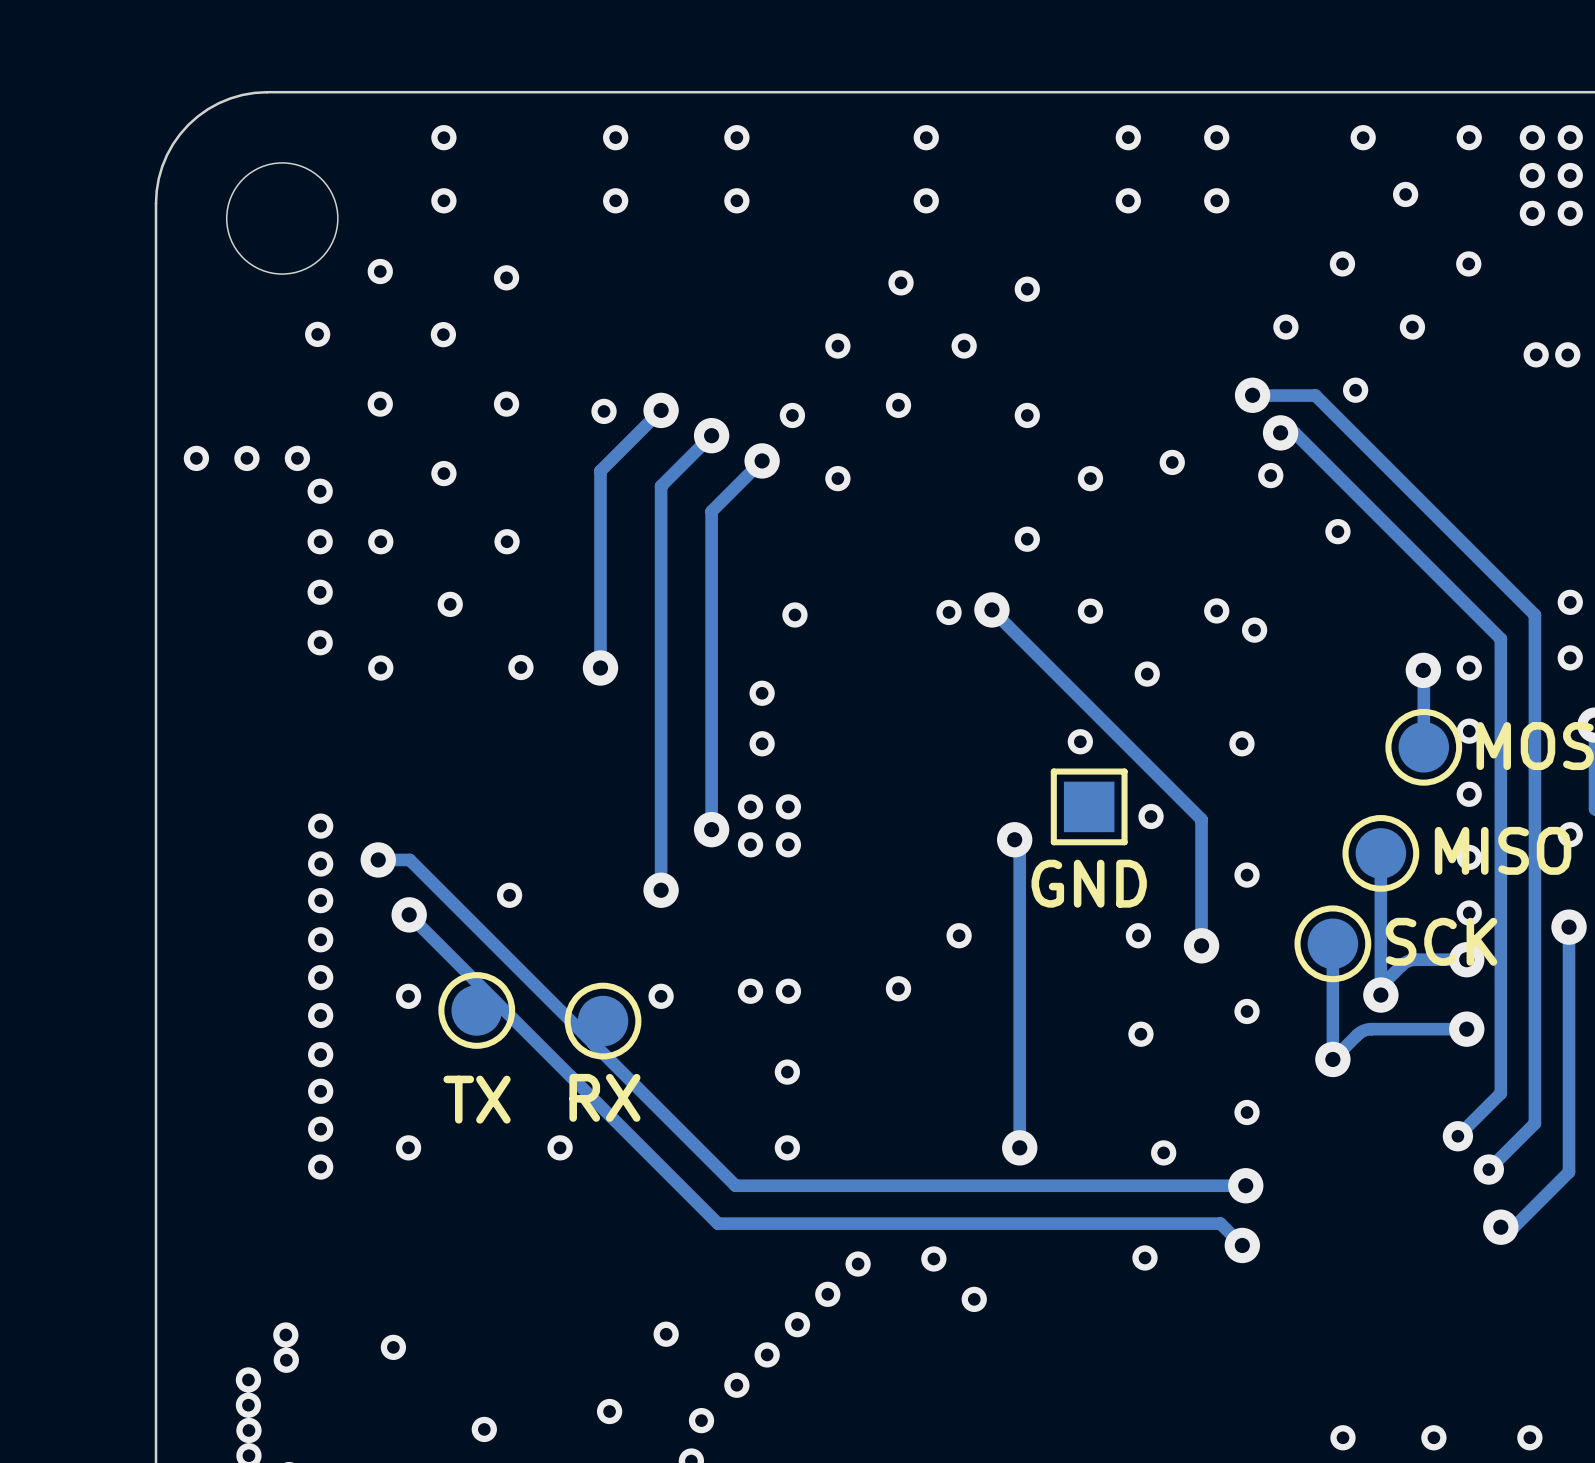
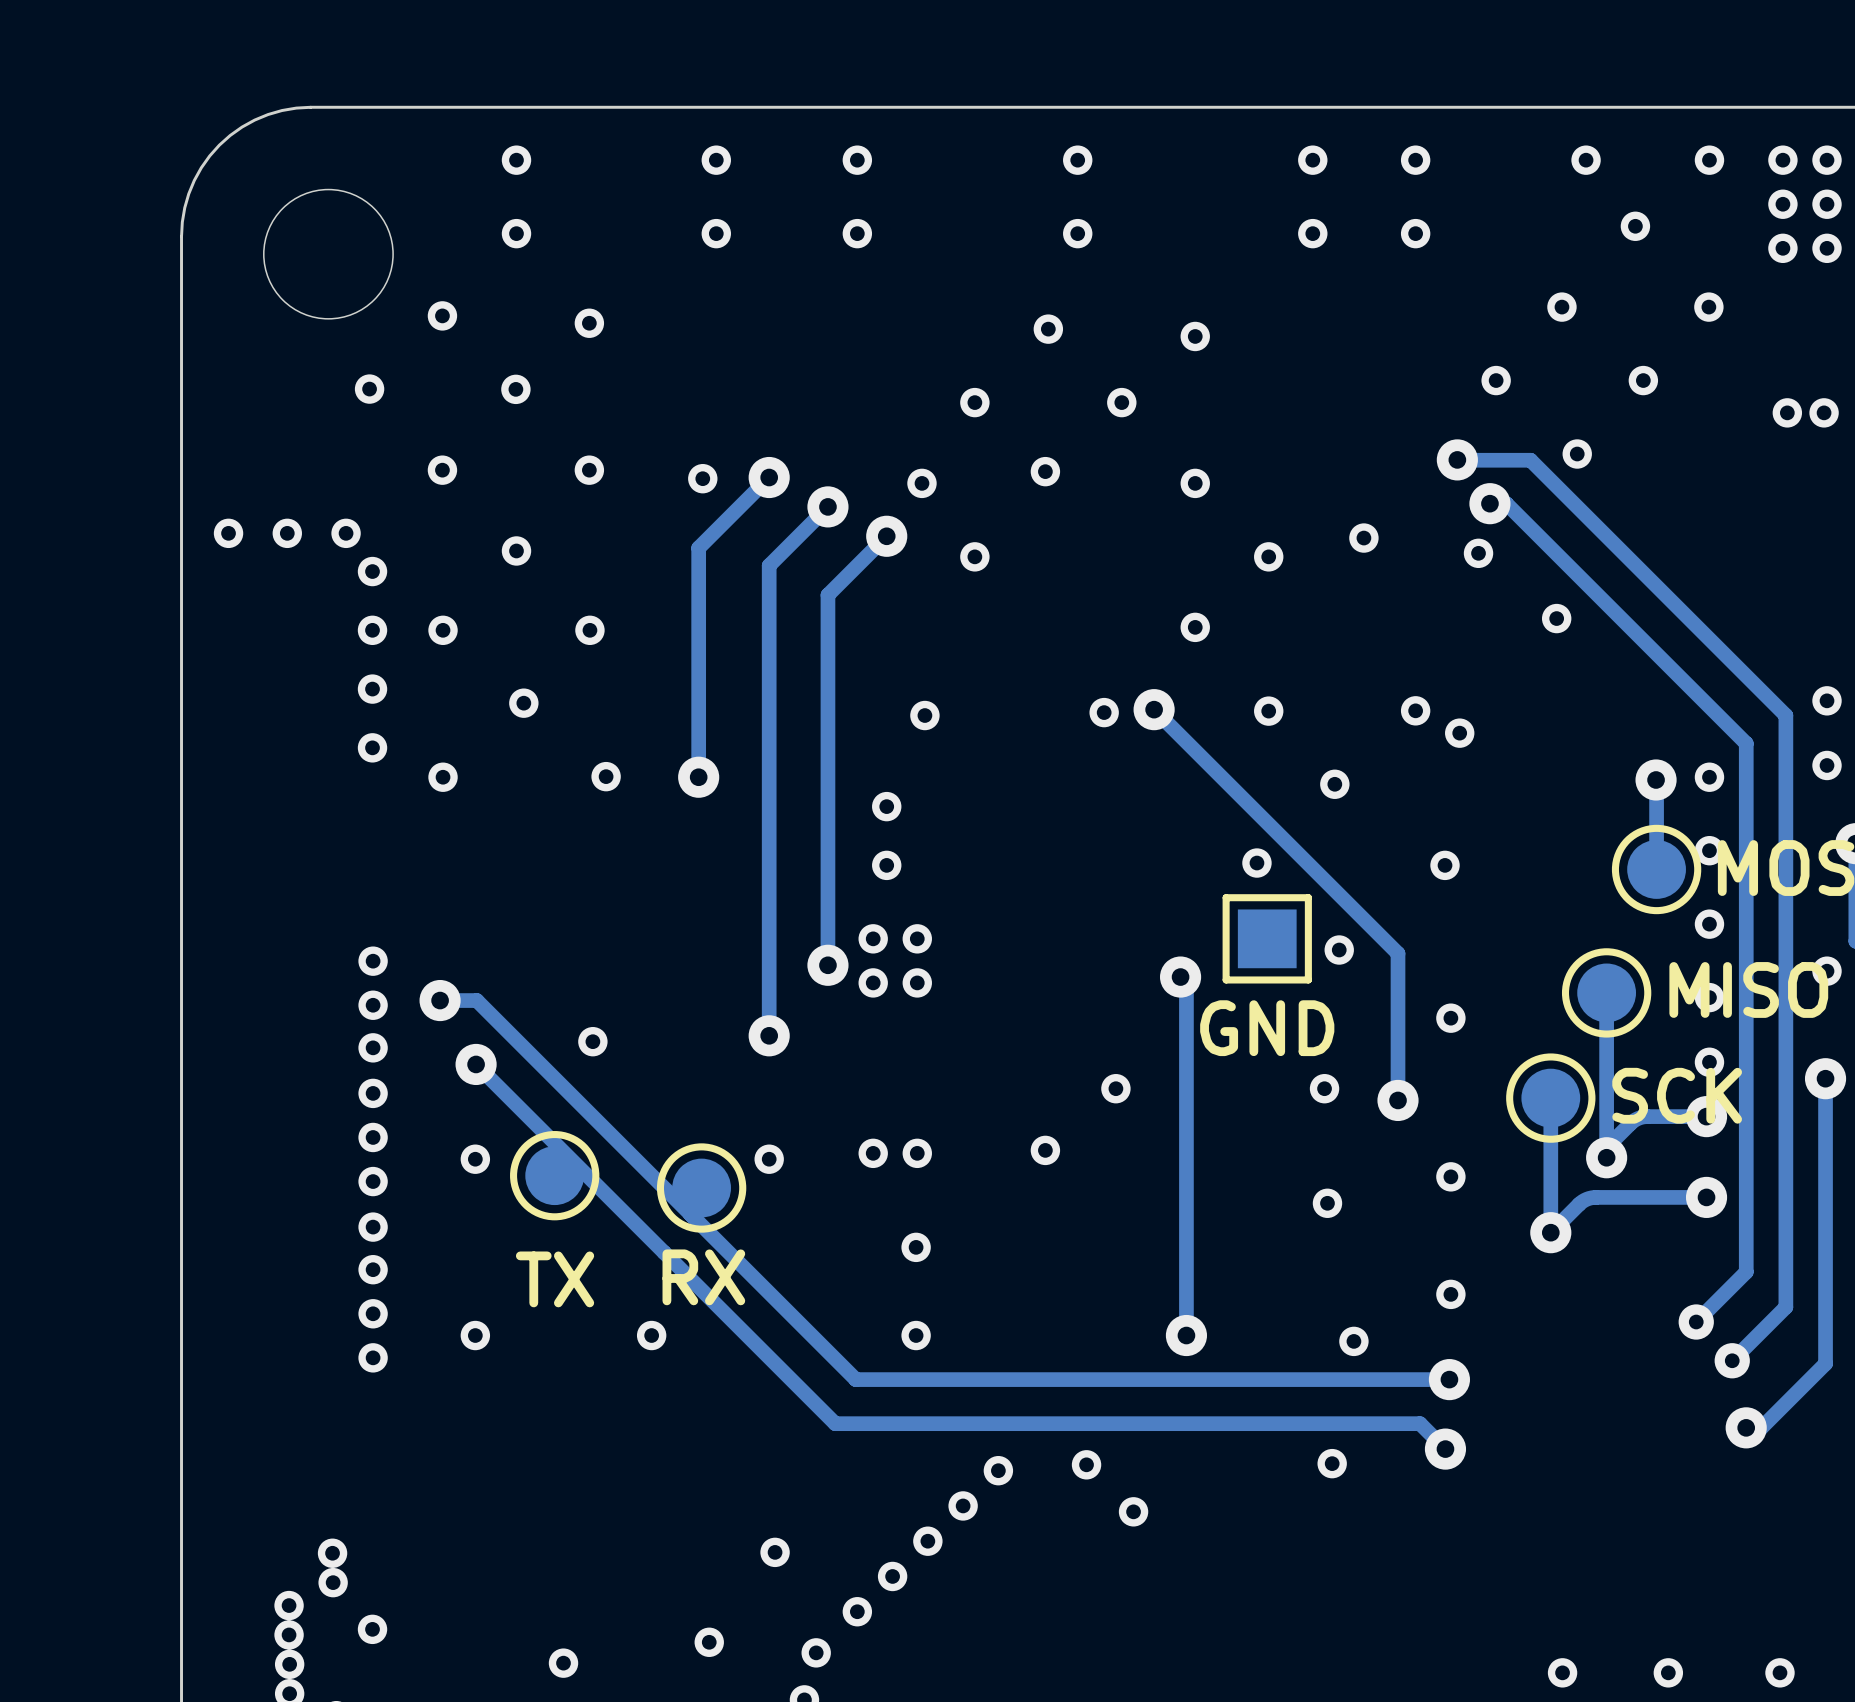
via position: (393, 1347) -> (372, 1629)

